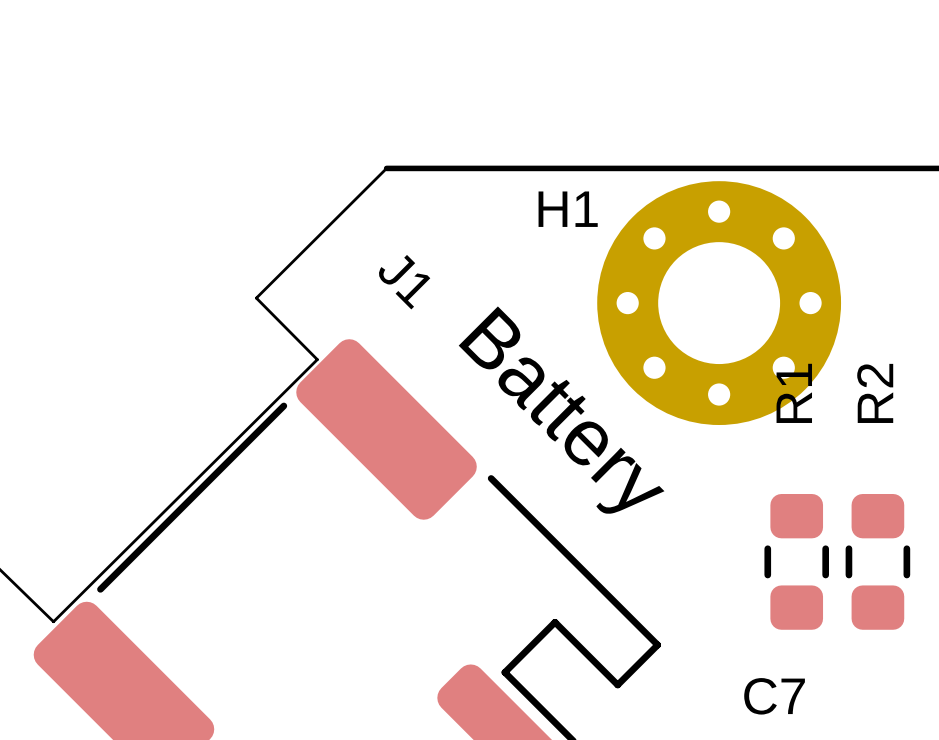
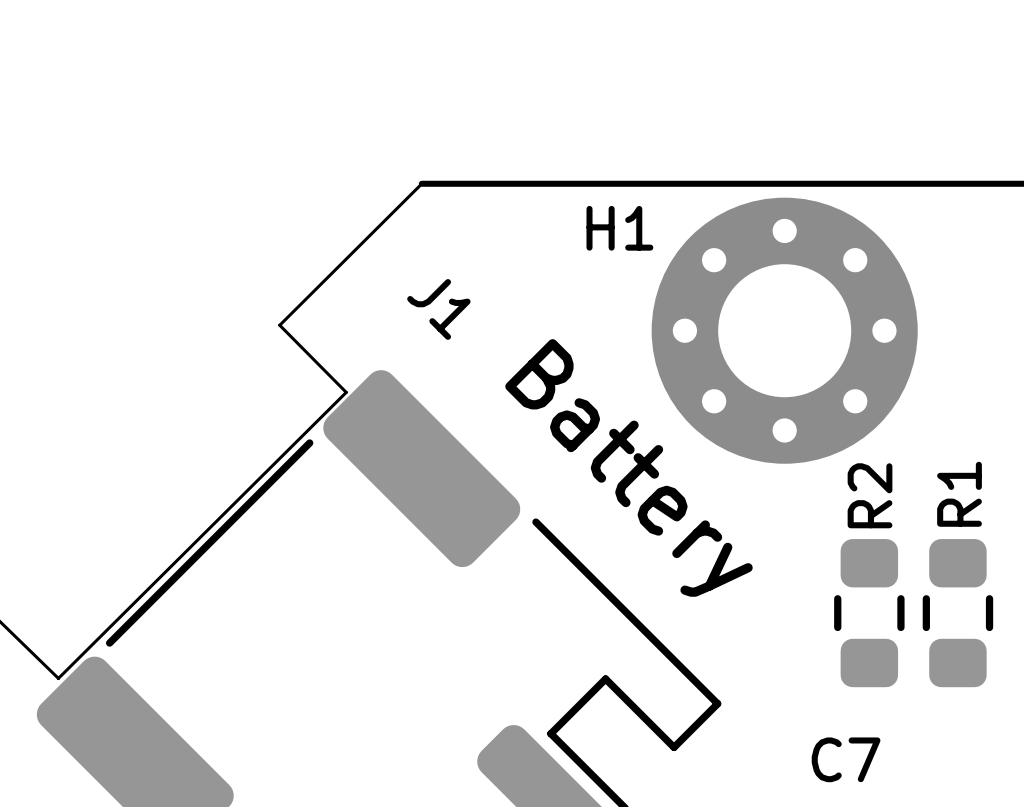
R1 name: R1 (794, 393) -> R2 (870, 495)
R2 name: R2 (875, 393) -> R1 (959, 494)

